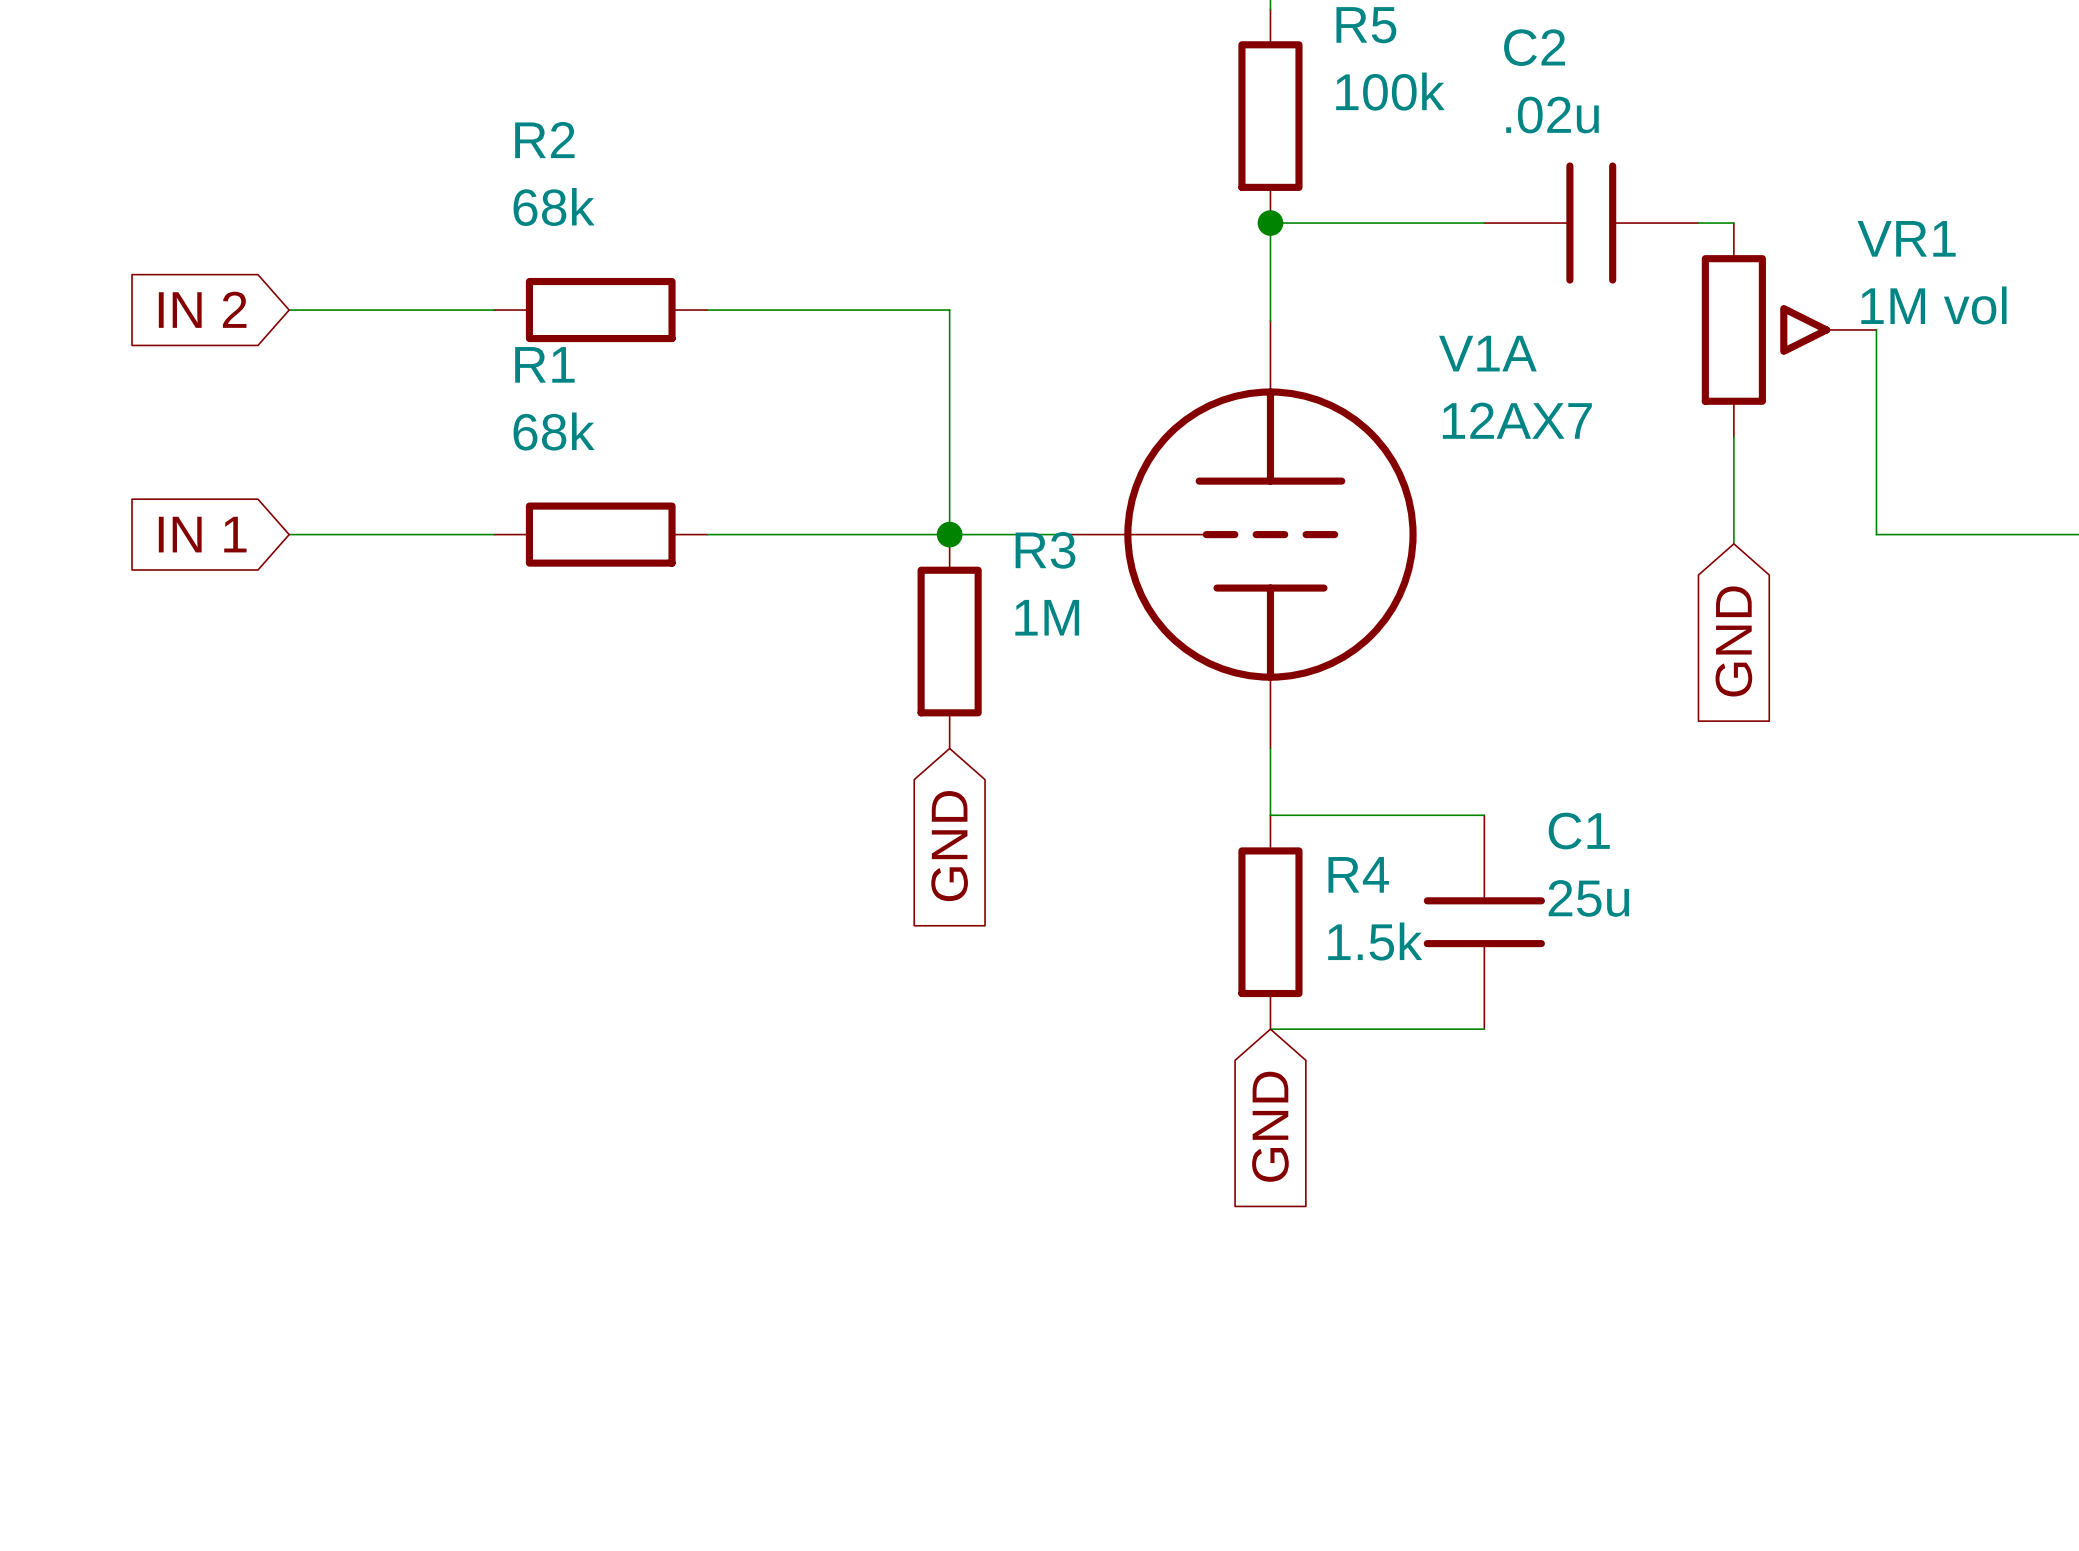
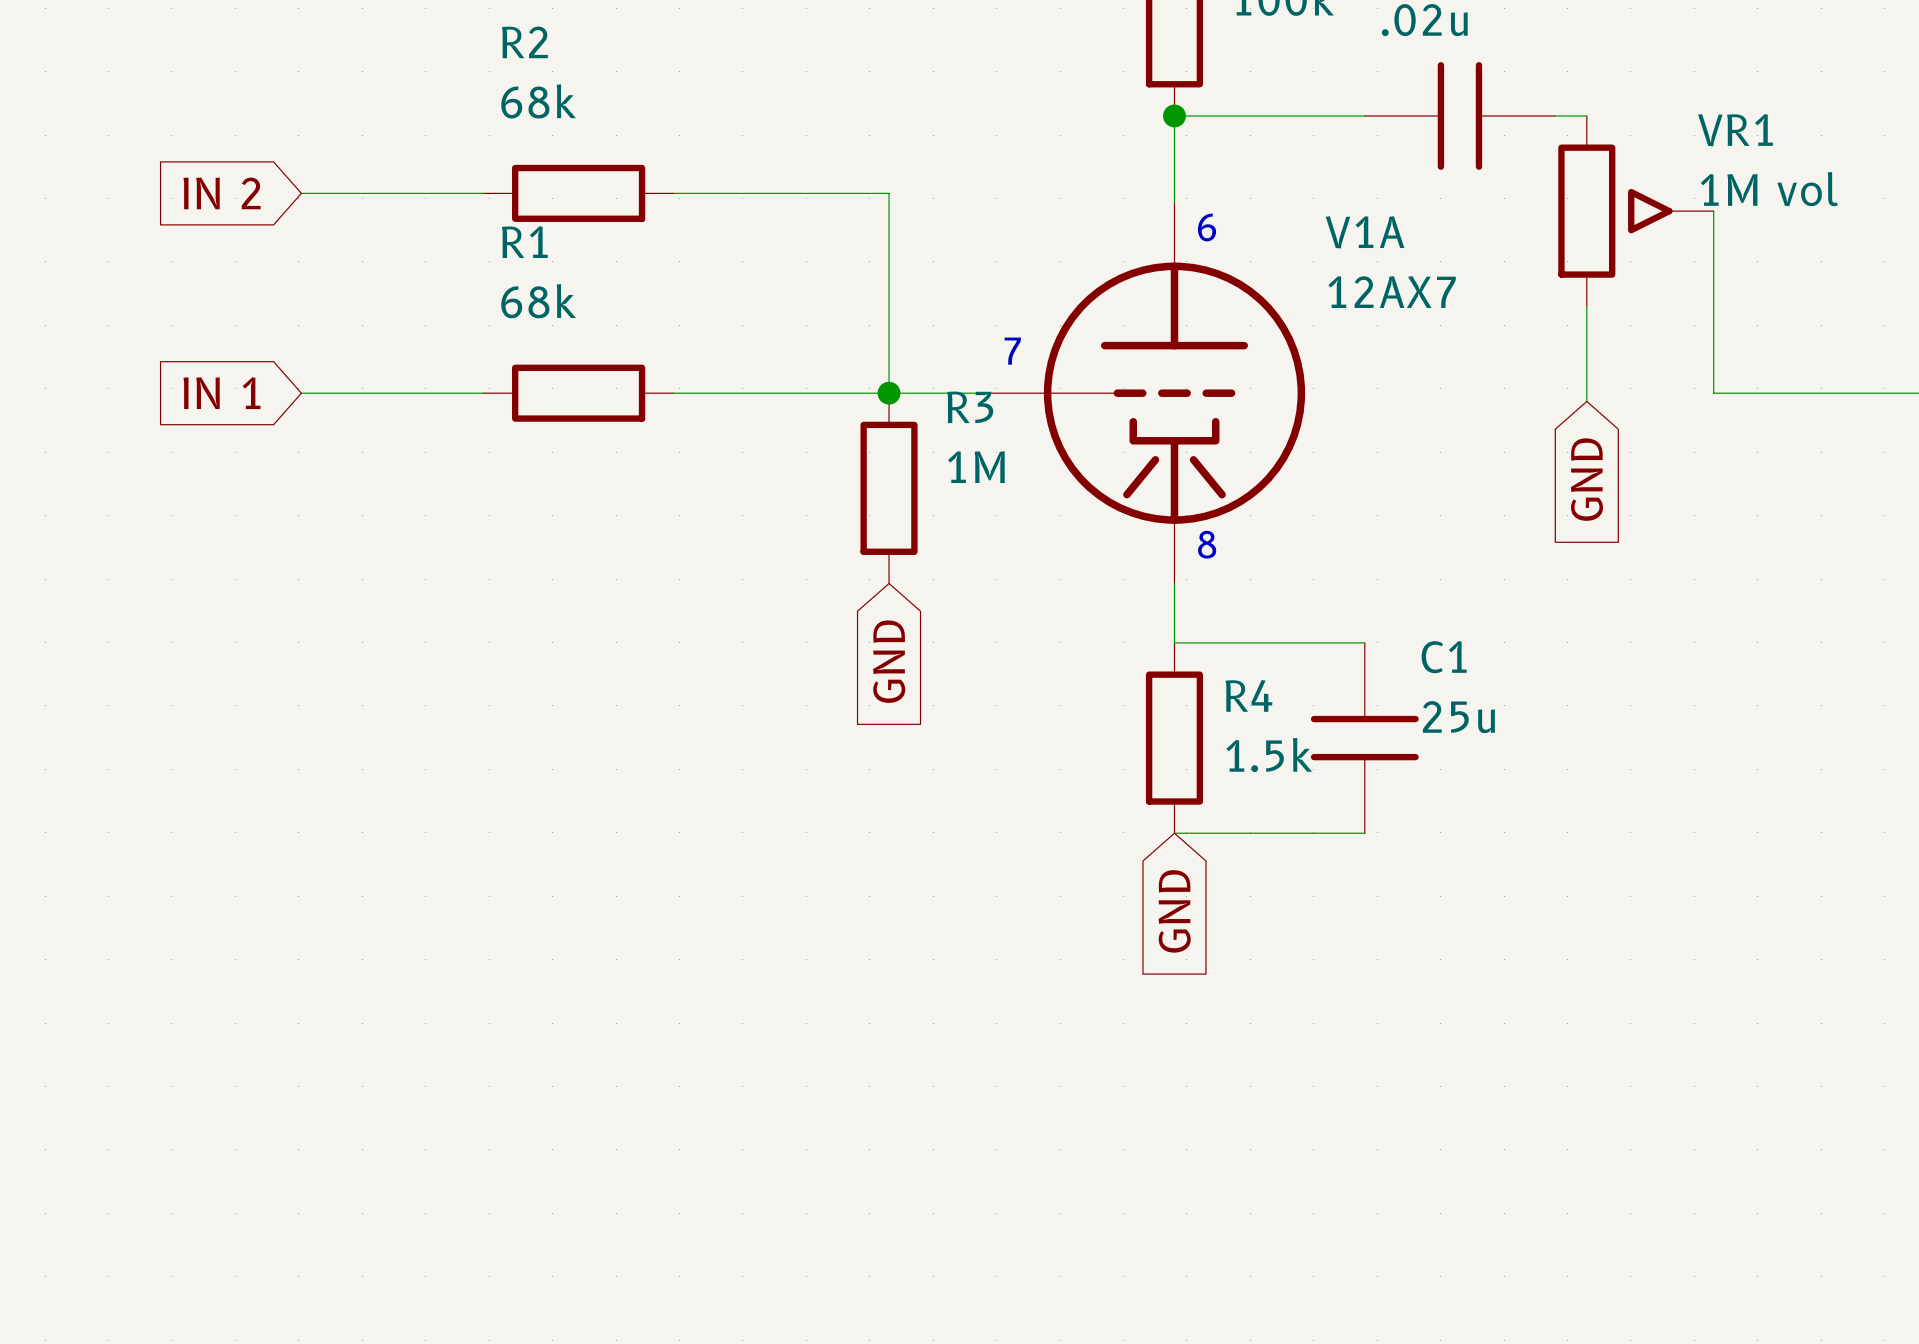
V1A symbol: [1056, 320, 1417, 749] -> [984, 202, 1306, 584]
text: none -> 6 (1207, 227)
text: none -> 7 (1012, 351)
text: none -> 8 (1207, 544)

